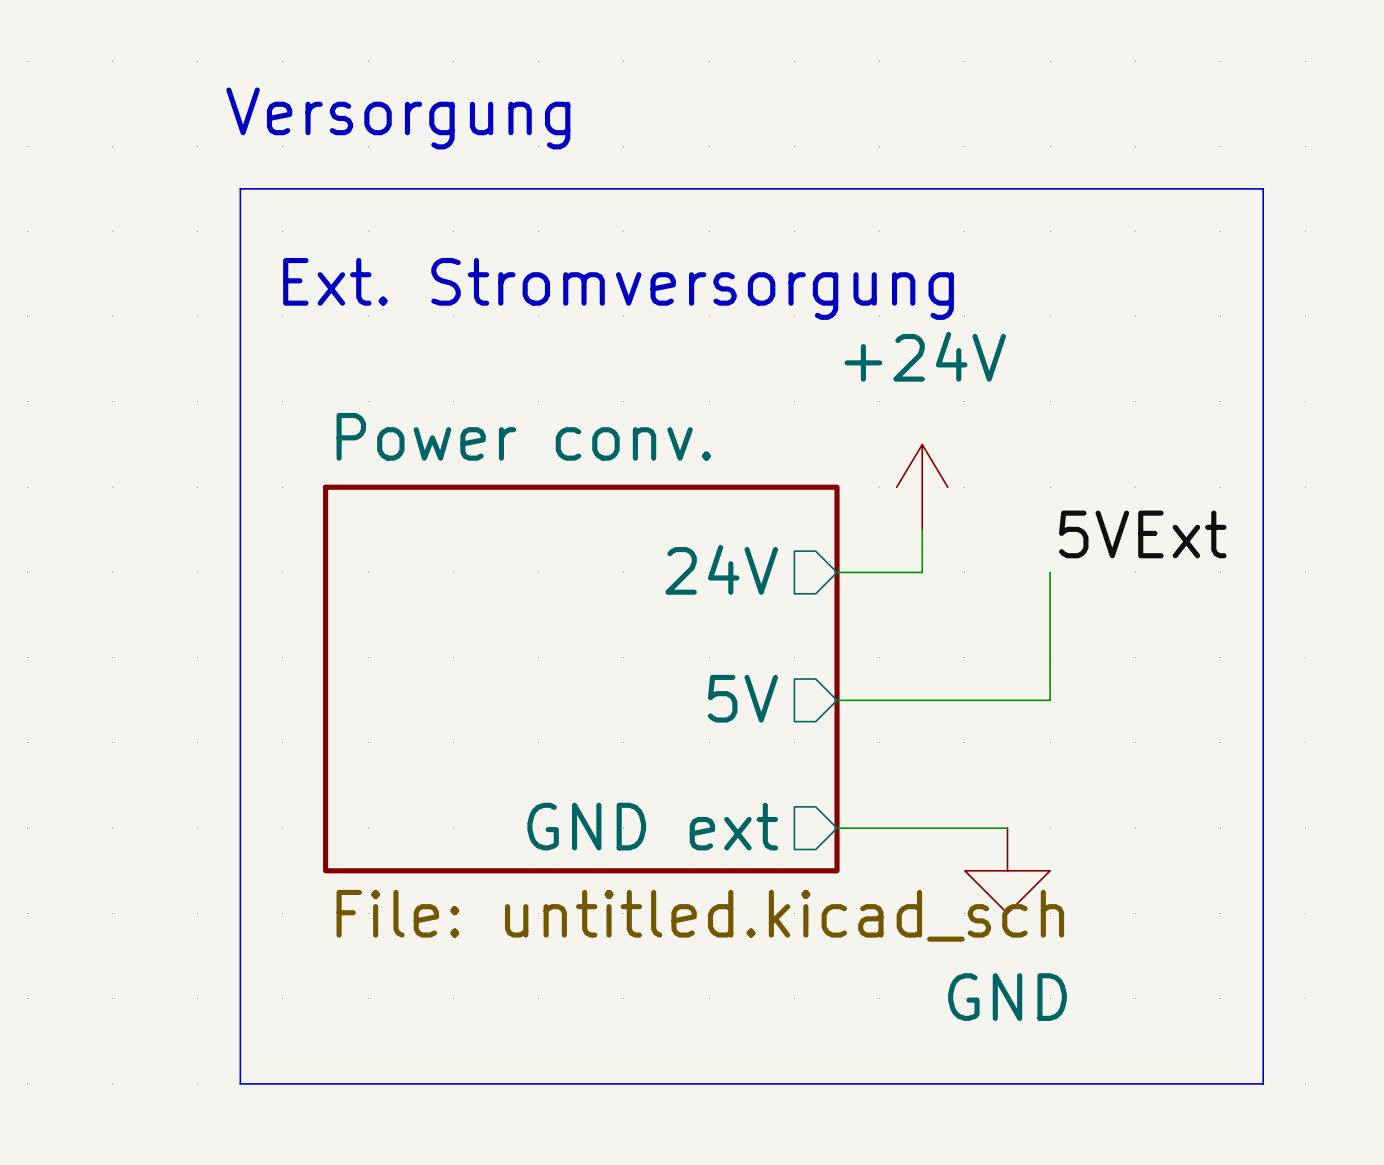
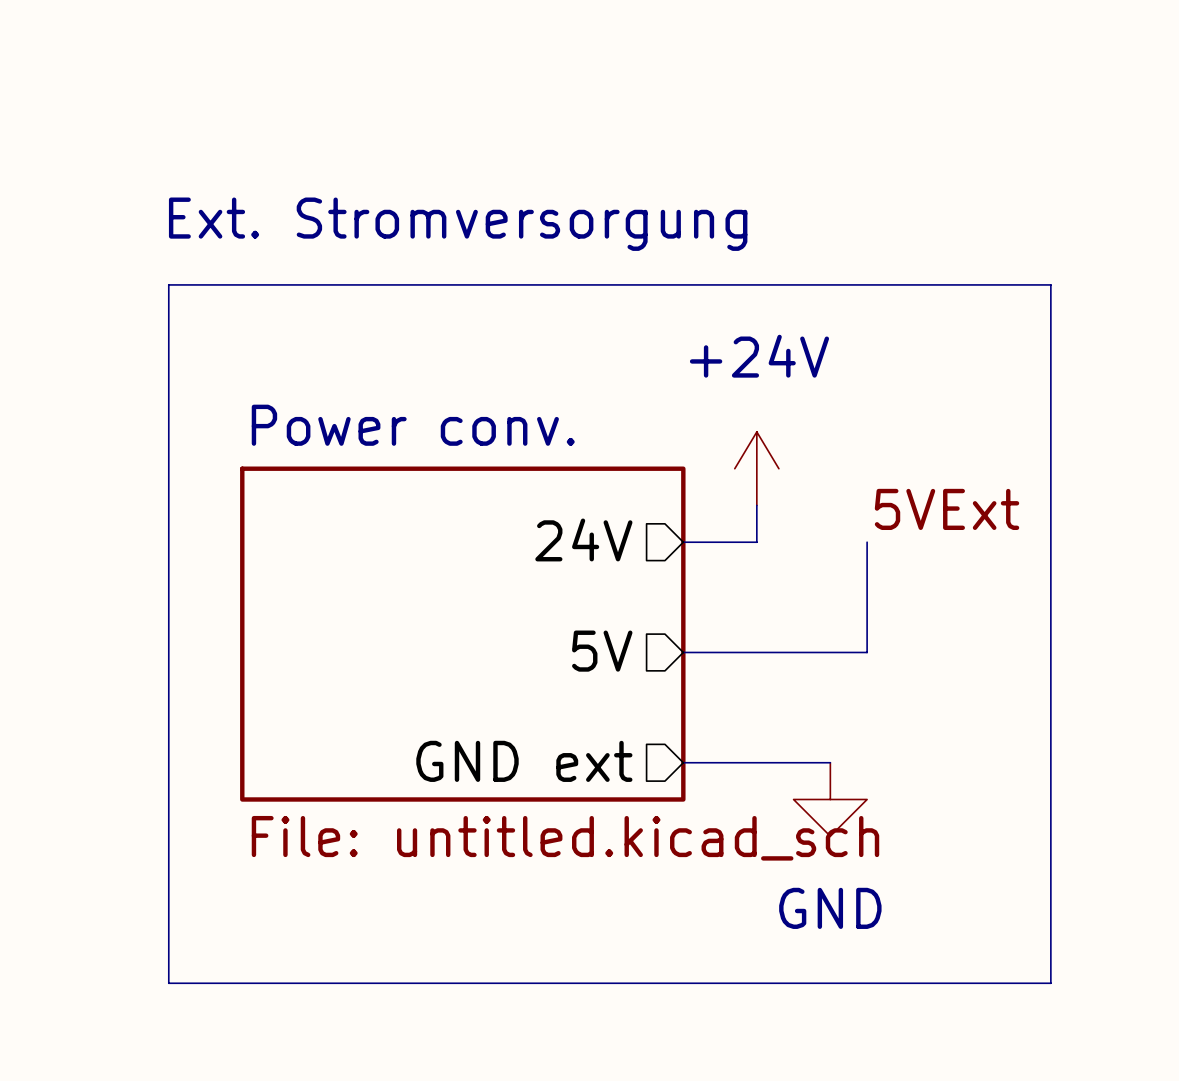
text: Versorgung (398, 118) -> none
line: (240, 274) (240, 188) (1263, 188) (1263, 274) -> (168, 284) (1050, 284)
text position: Ext. Stromversorgung (618, 288) -> Ext. Stromversorgung (458, 224)

